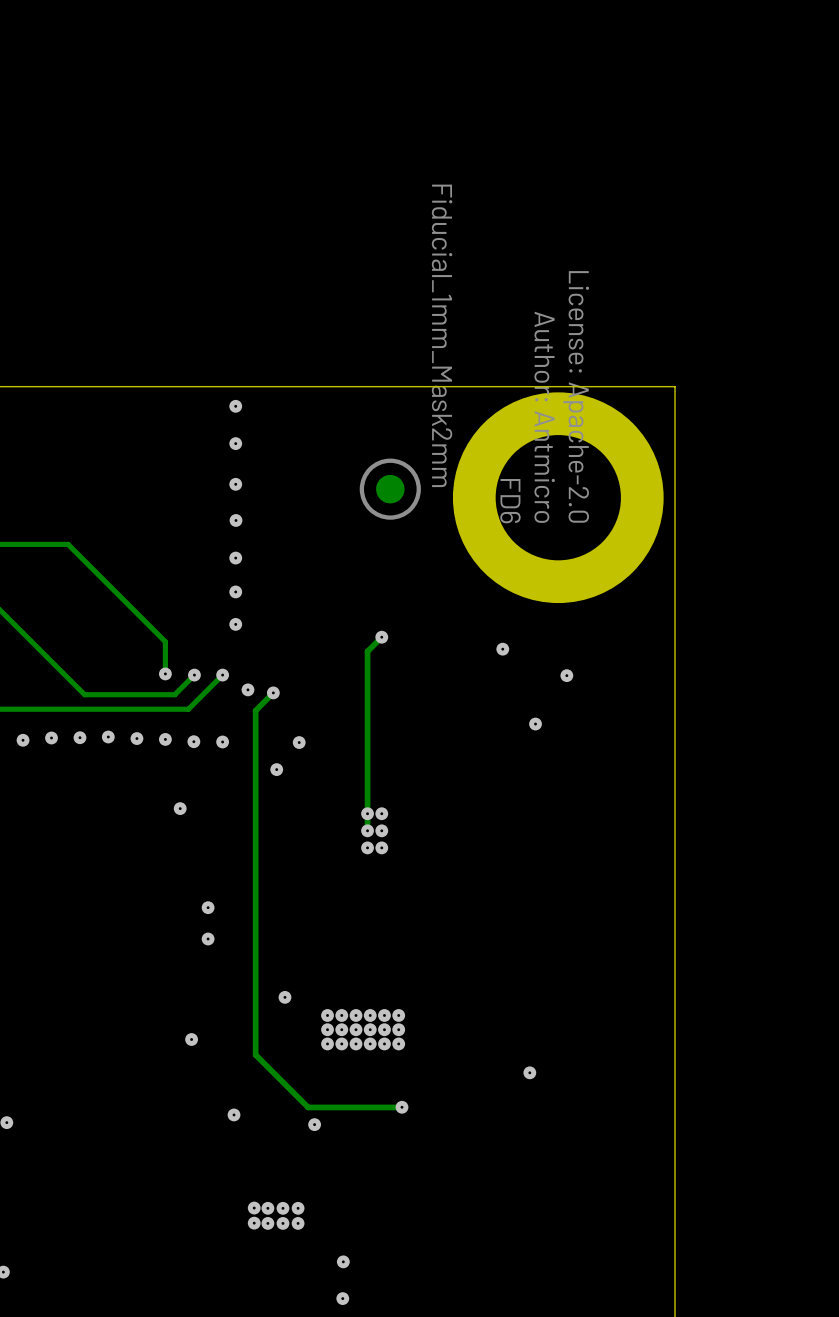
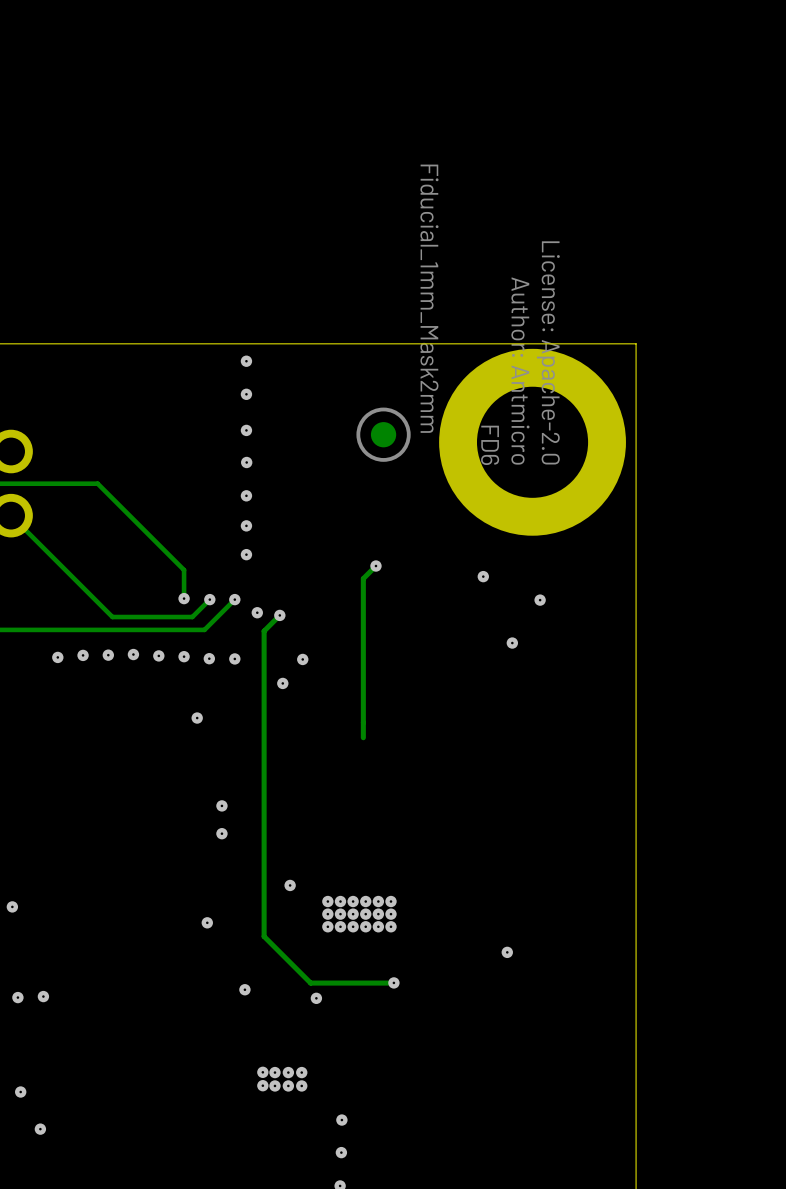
via: (367, 813) -> none
via: (381, 813) -> none
via: (367, 830) -> none
via: (381, 830) -> none
via: (367, 847) -> none
via: (381, 847) -> none

